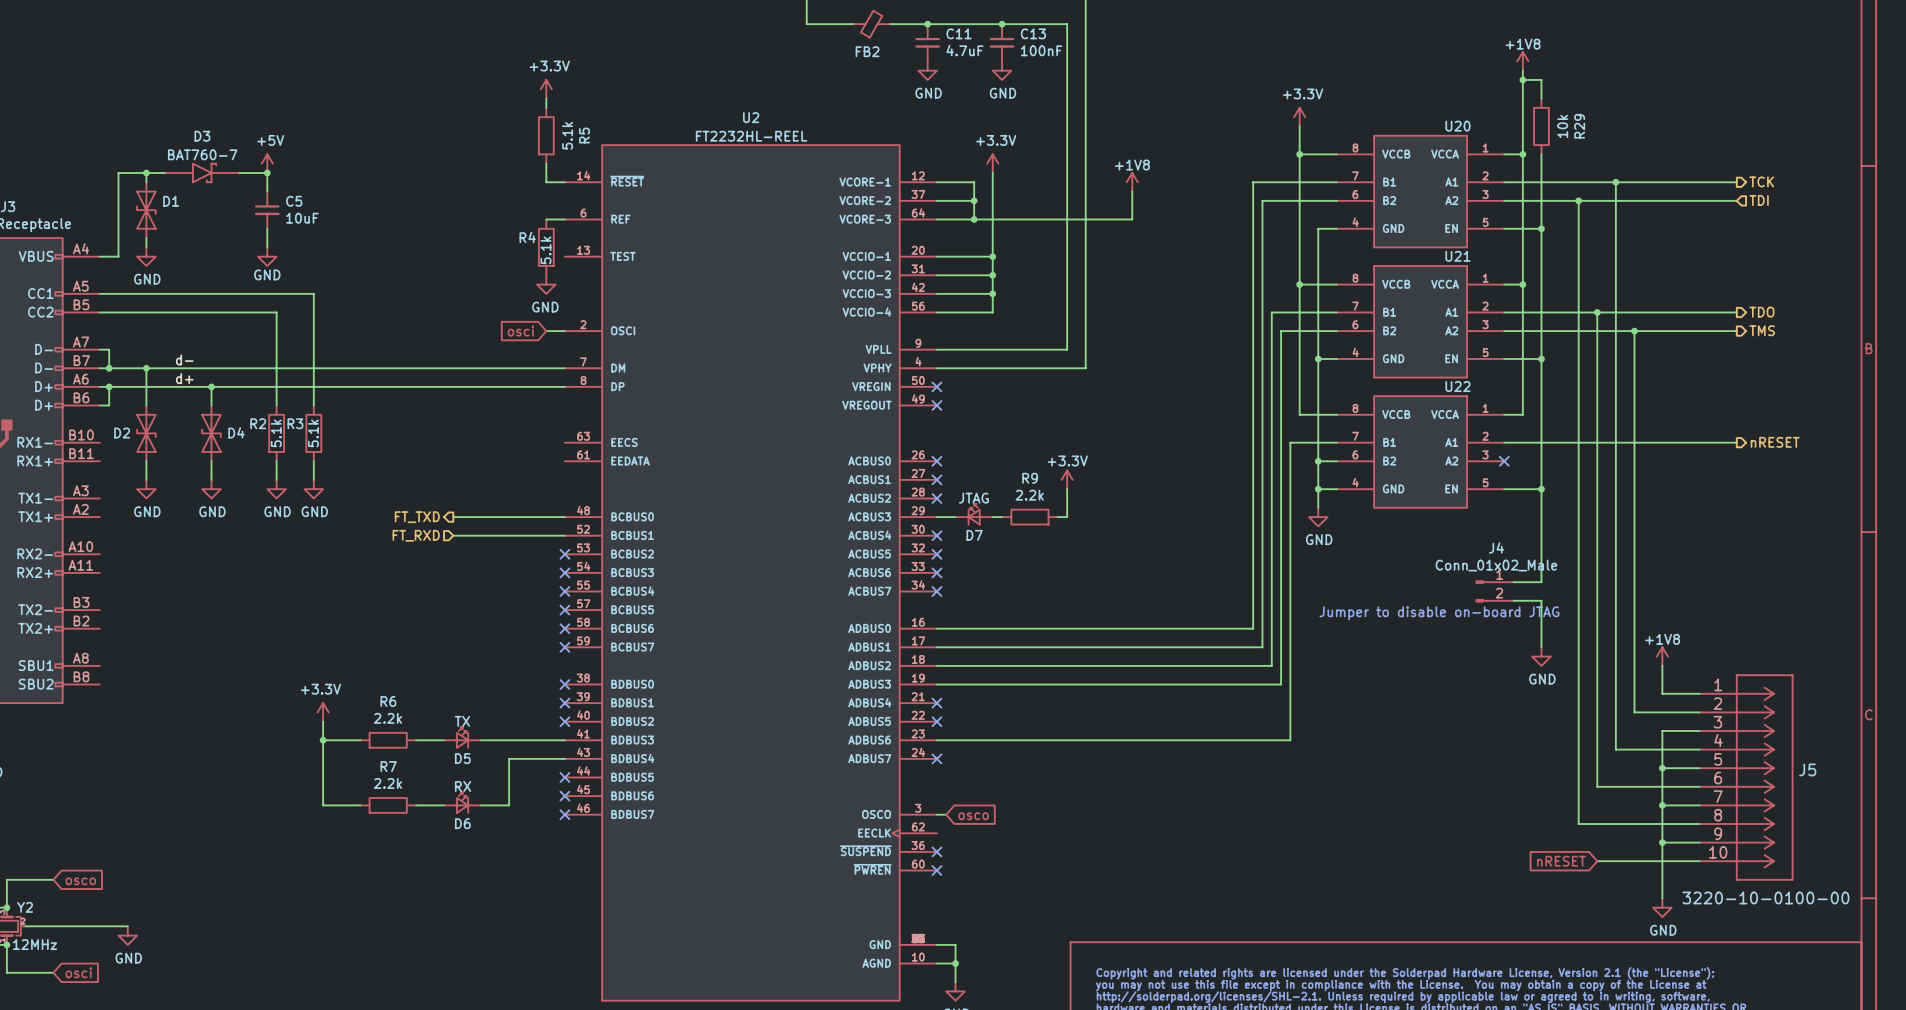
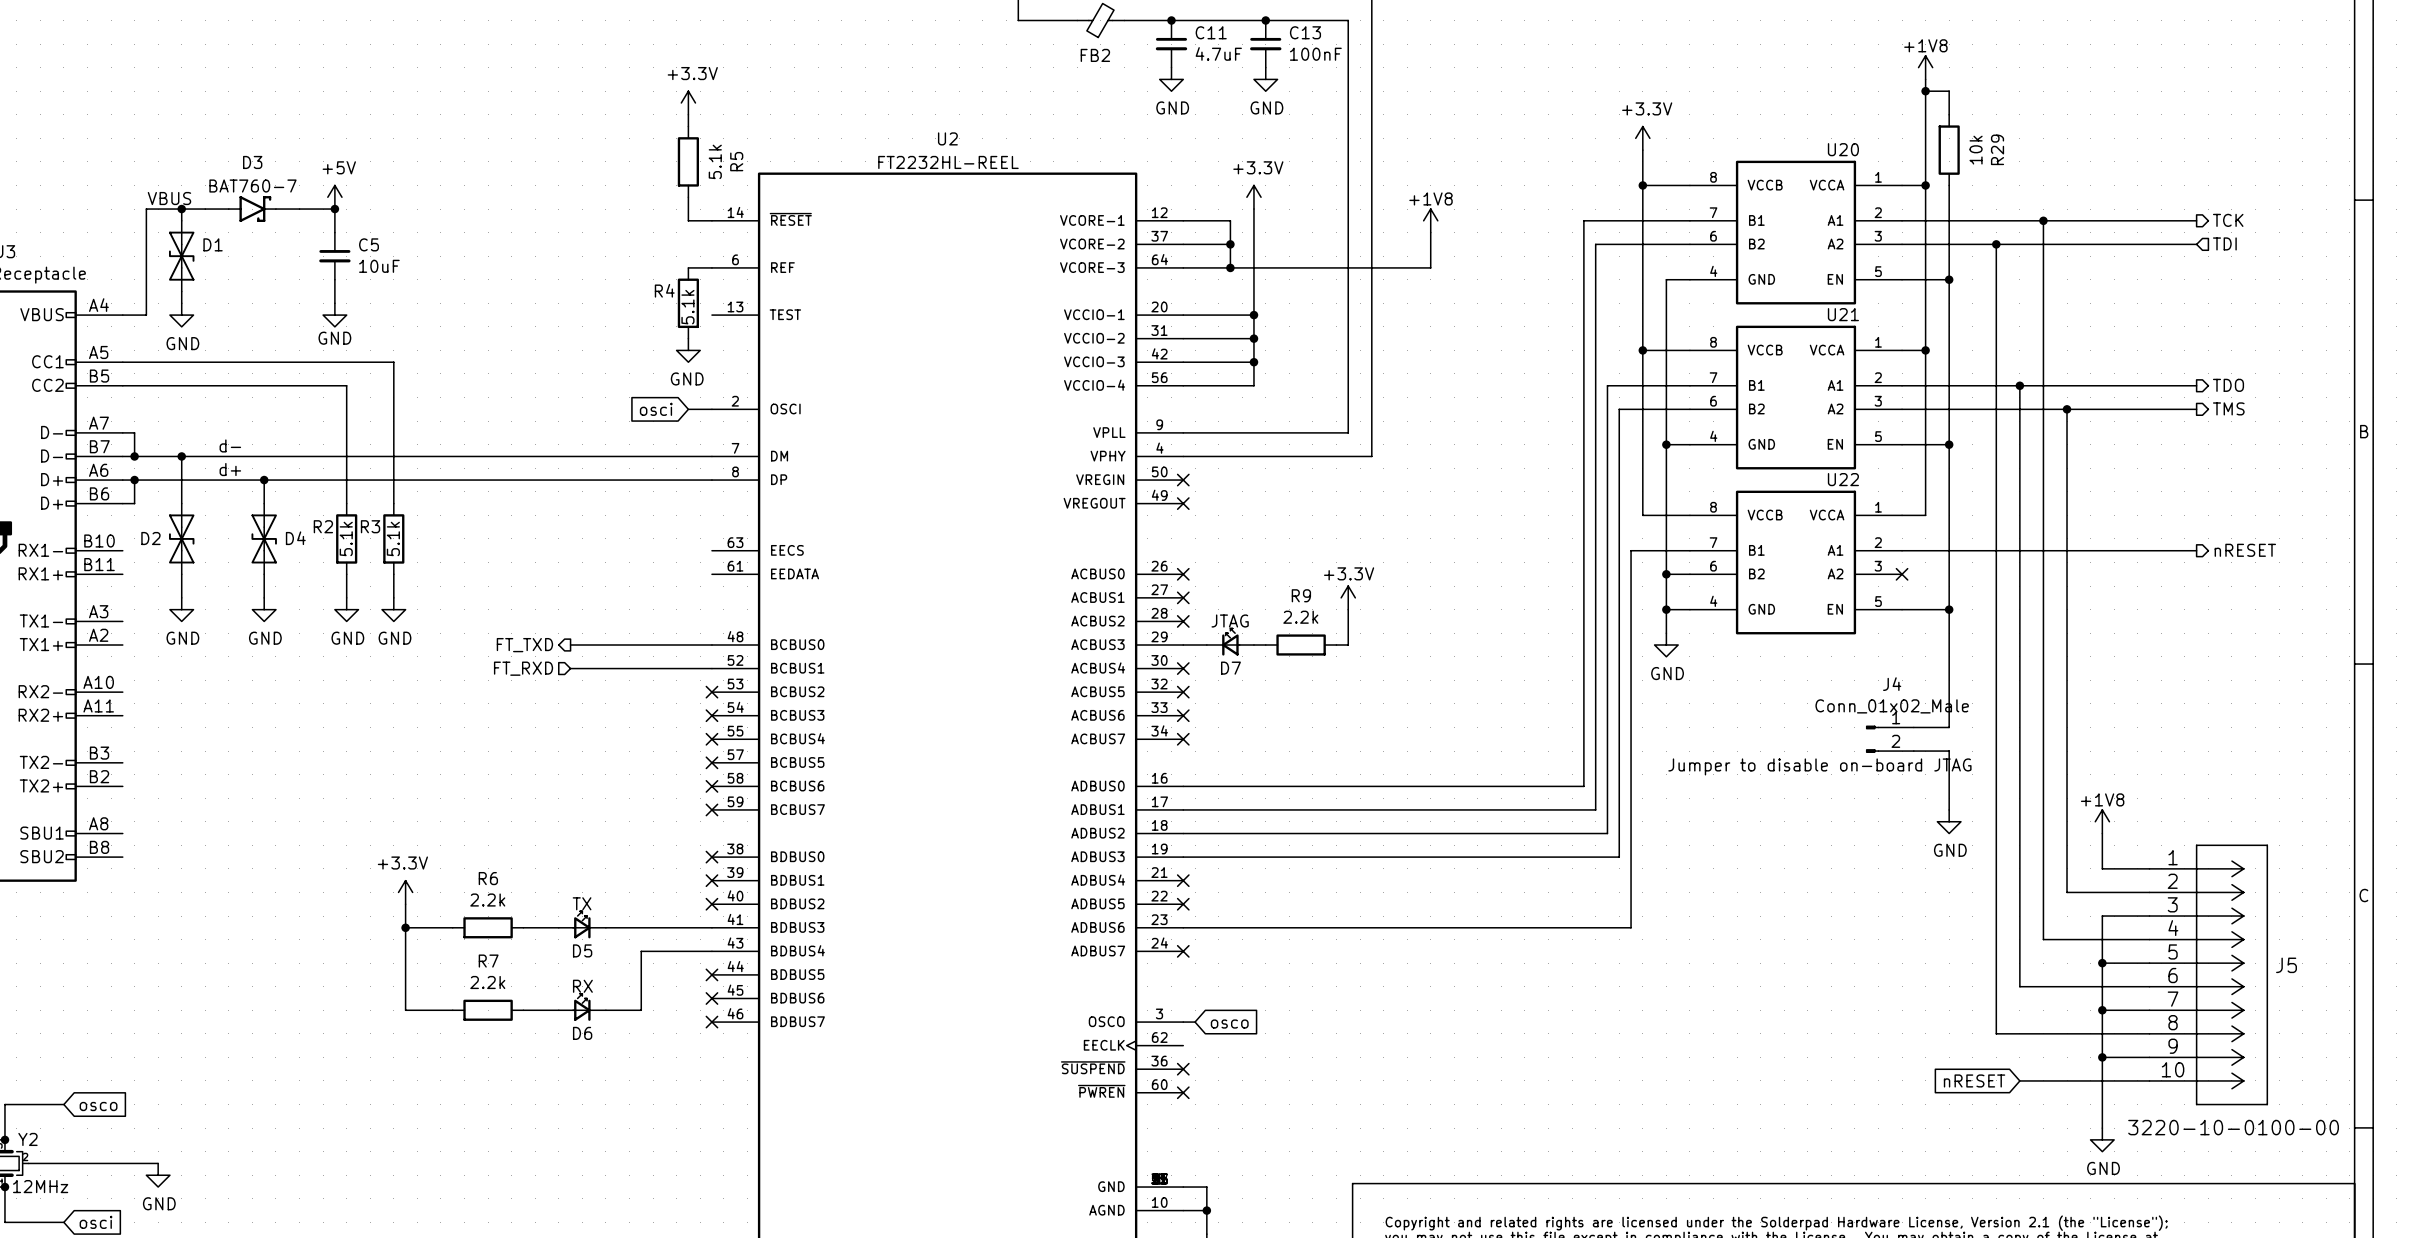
label: none -> VBUS (169, 198)

